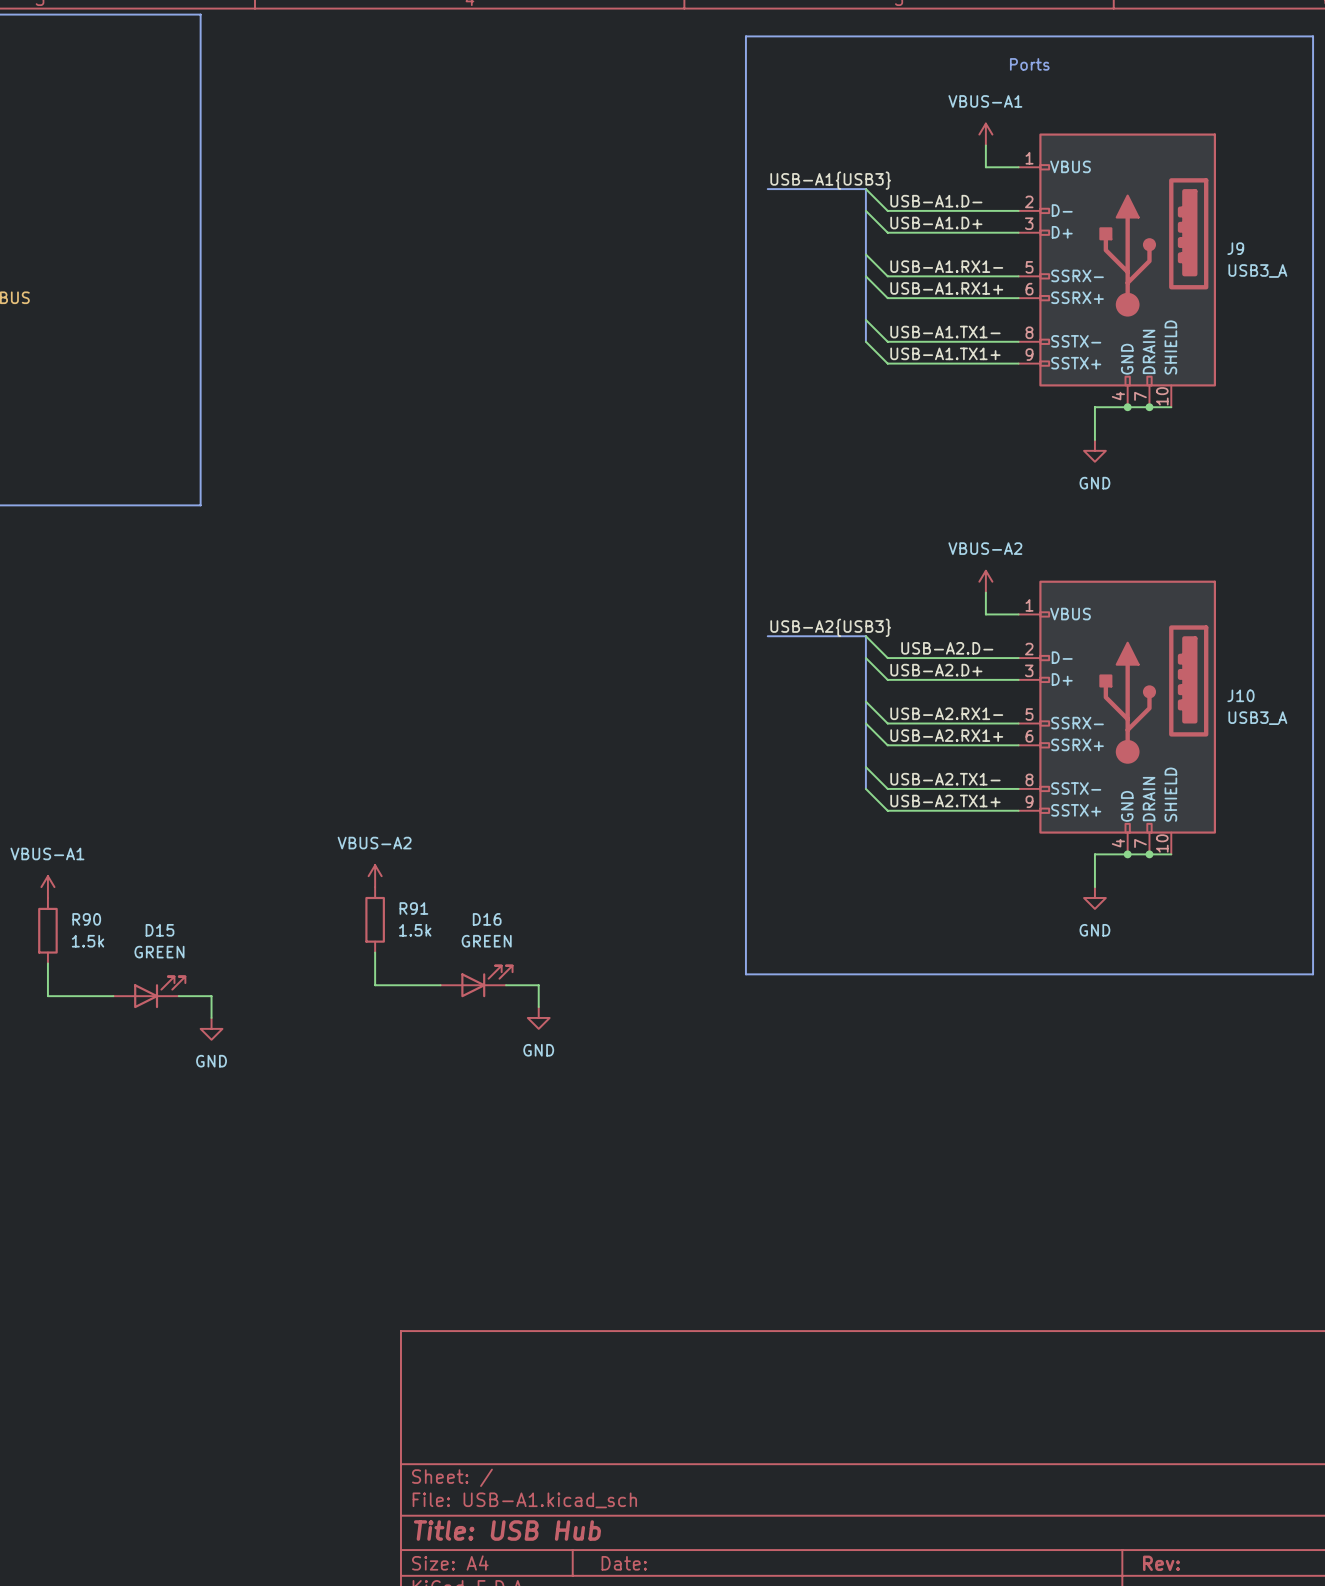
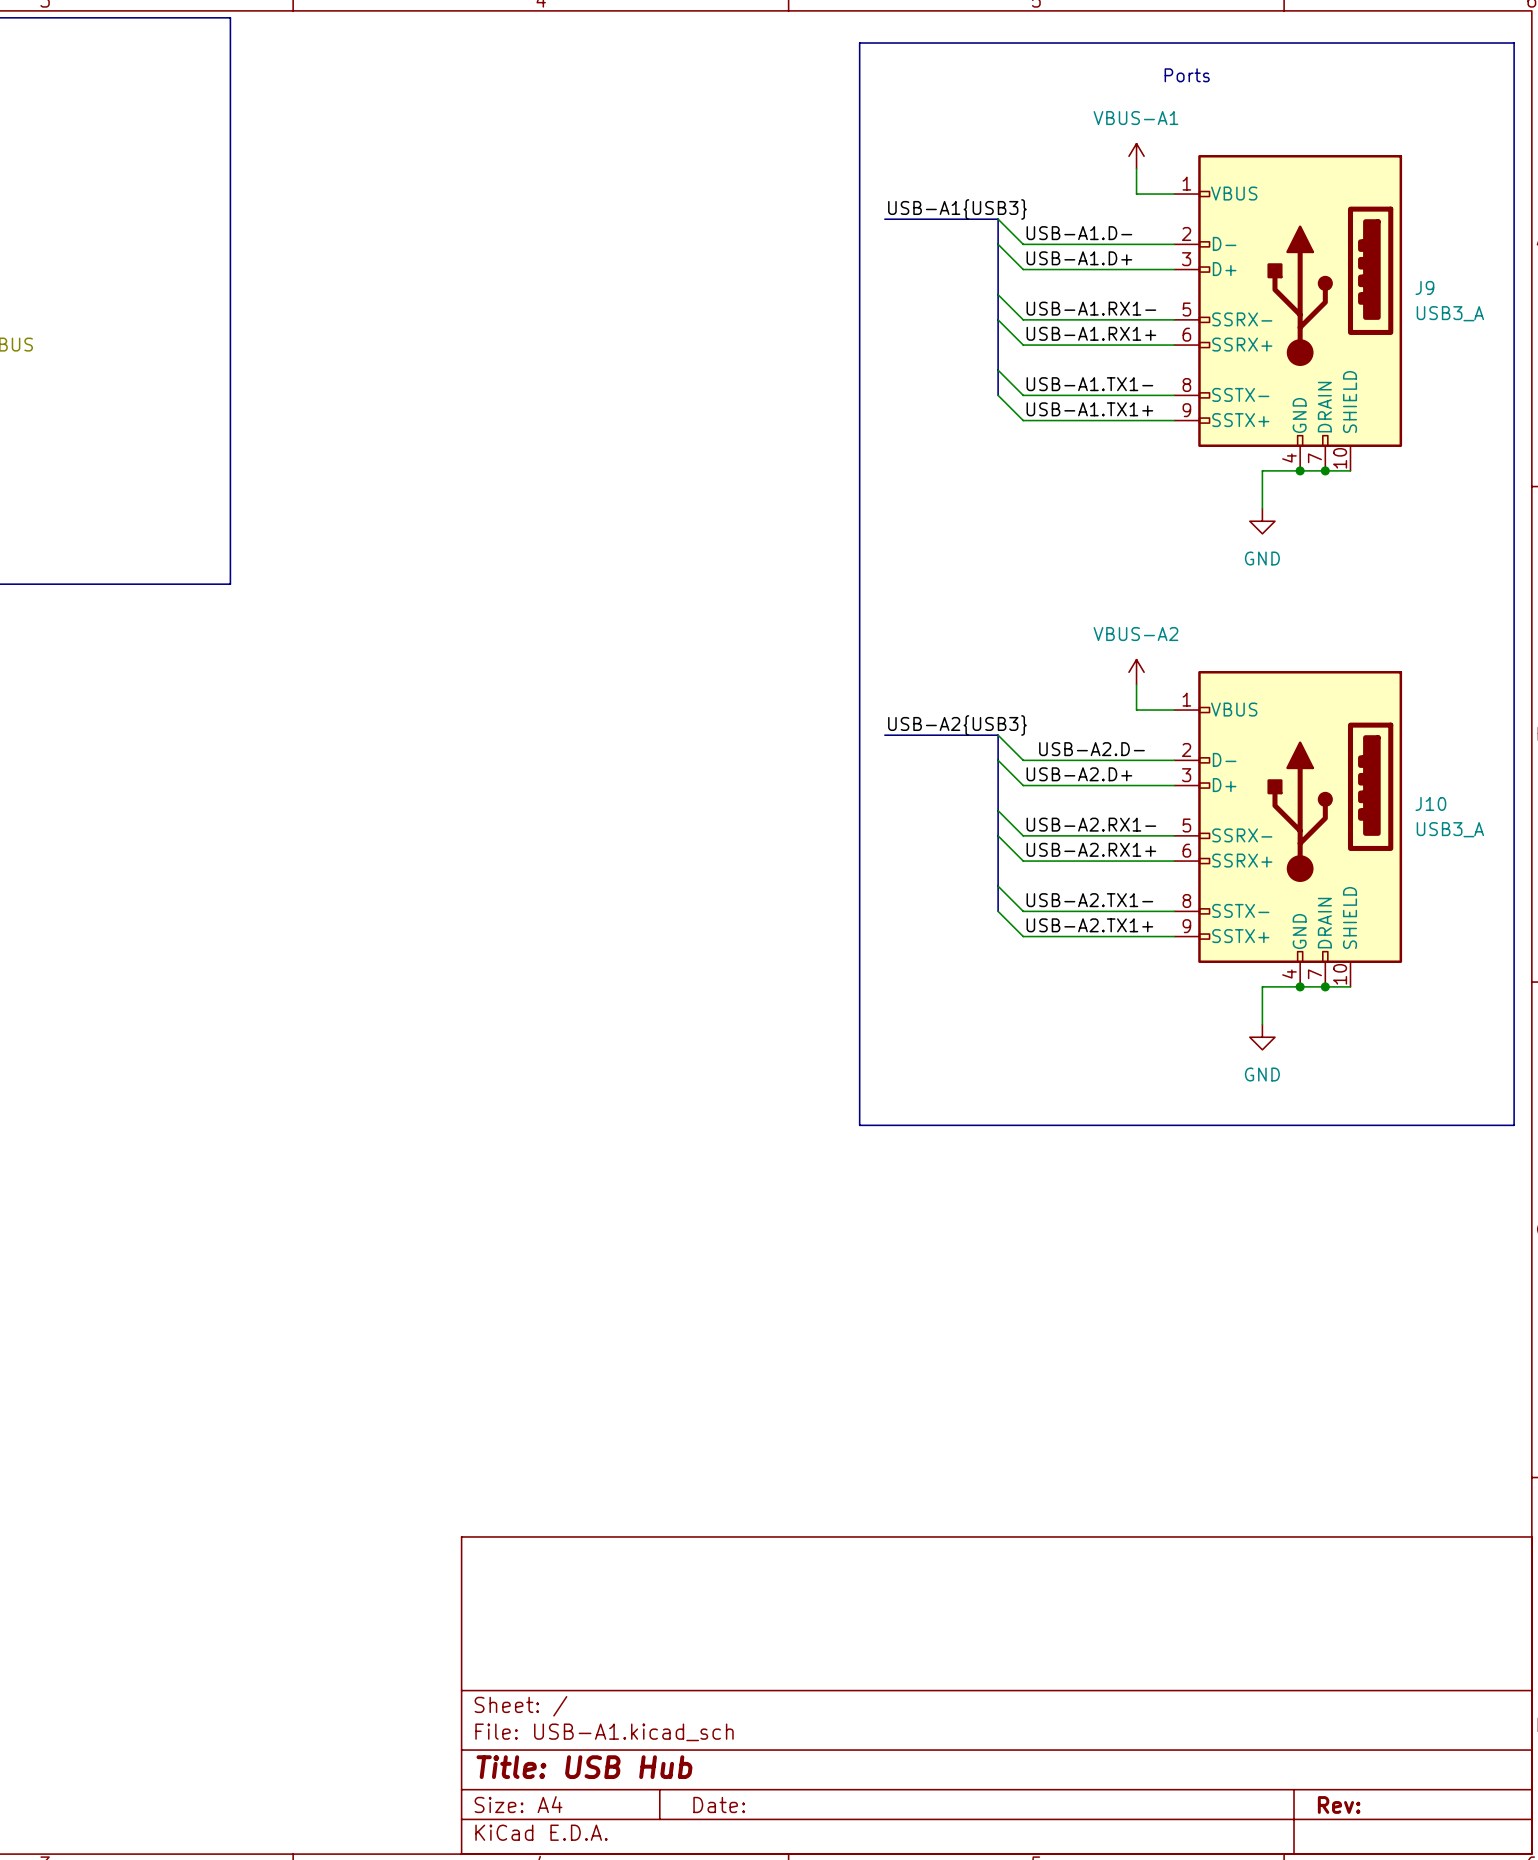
power symbol: VBUS-A2 (375, 876) -> none
power symbol: VBUS-A1 (47, 887) -> none
R91: 1.5k (375, 919) -> none
R90: 1.5k (47, 930) -> none
wire: (375, 952) (375, 985) (440, 985) -> none
wire: (47, 963) (47, 996) (113, 996) -> none
D16: GREEN (476, 981) -> none
wire: (506, 985) (538, 985) (538, 1007) -> none
D15: GREEN (149, 992) -> none
wire: (178, 996) (211, 996) (211, 1017) -> none
power symbol: GND (538, 1017) -> none
power symbol: GND (211, 1028) -> none

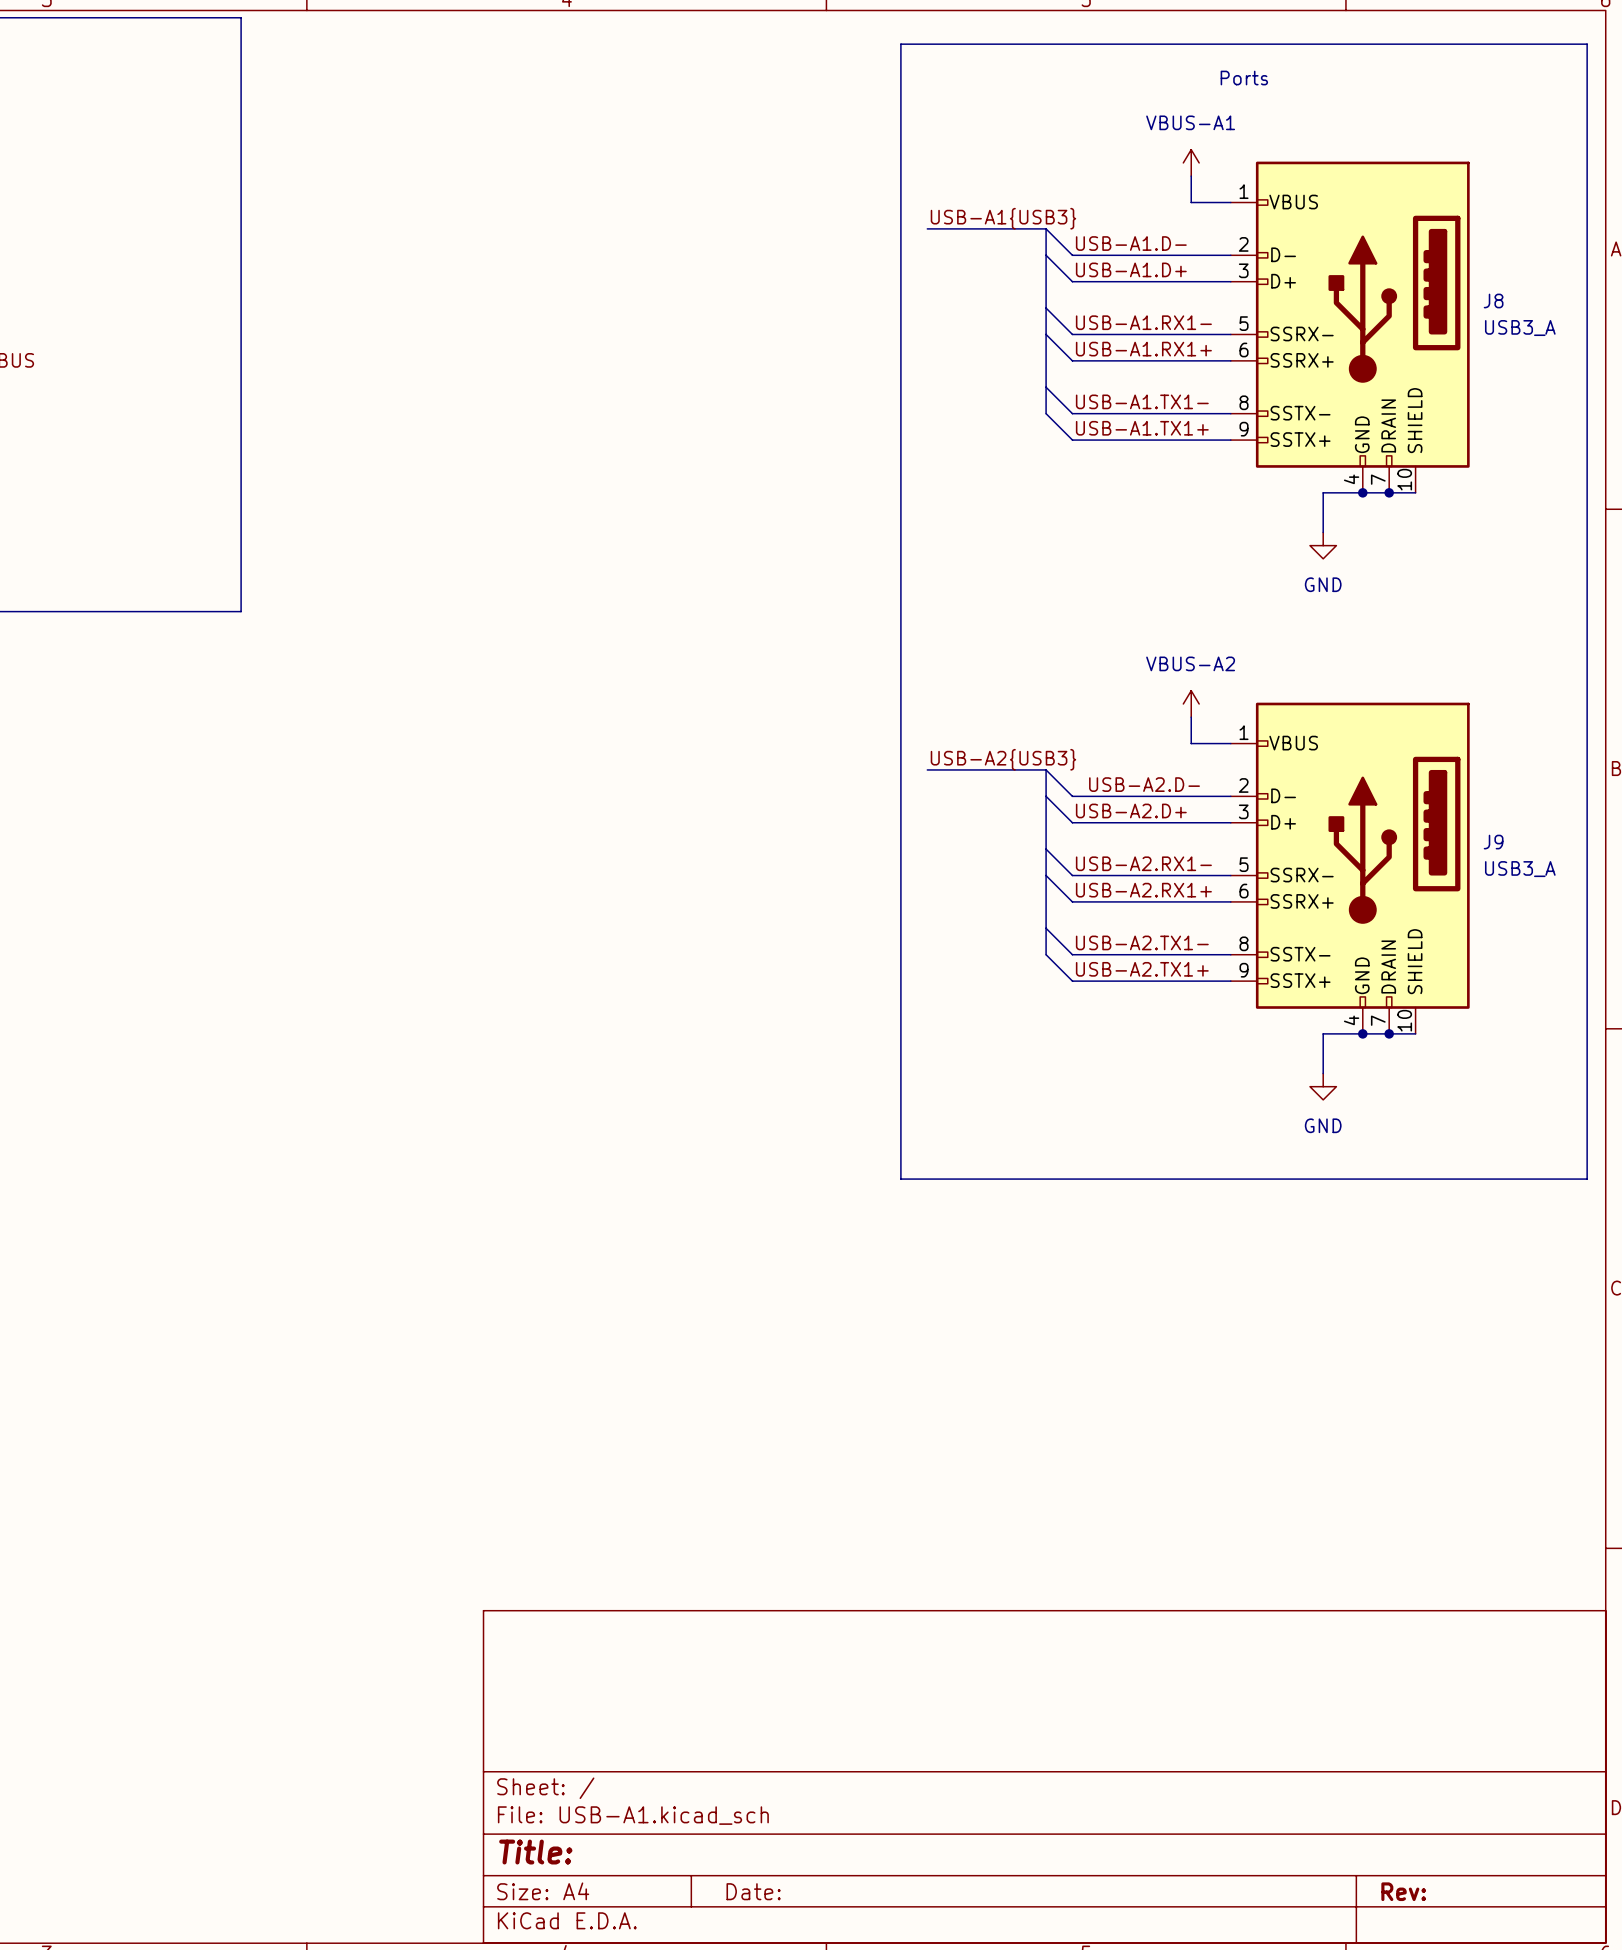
J9 name: J9 (1424, 287) -> J8 (1493, 301)
J10 name: J10 (1430, 803) -> J9 (1493, 842)
title block: Title: USB Hub (584, 1767) -> Title: (535, 1852)

